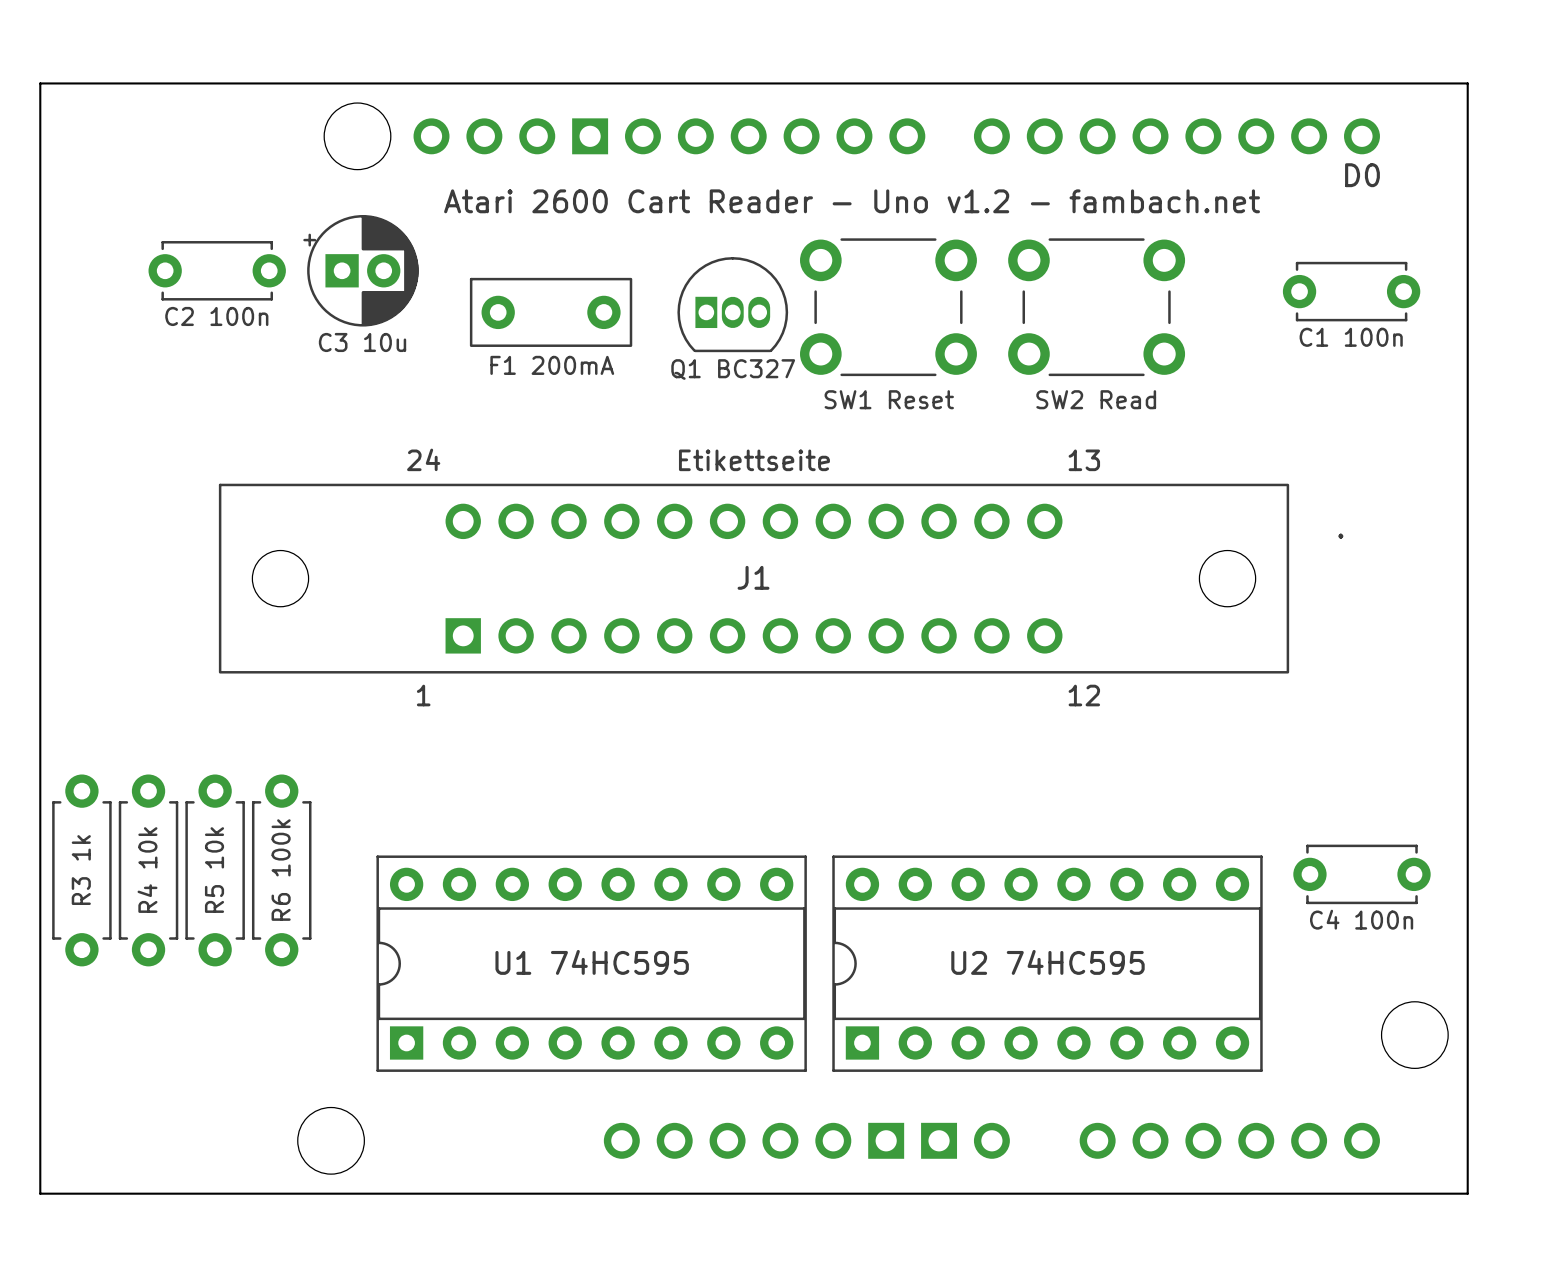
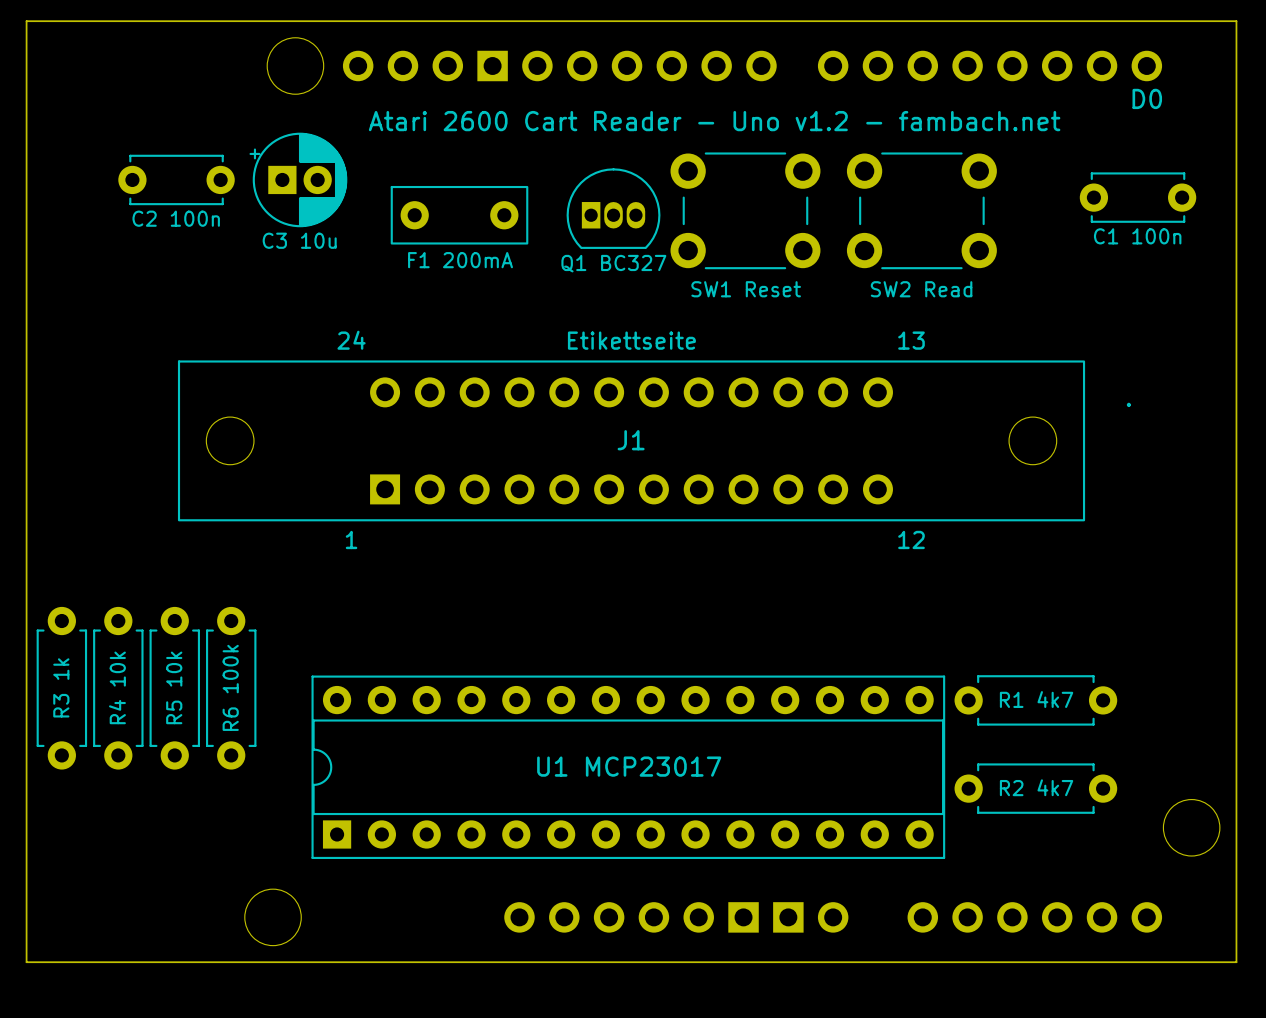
part: (1361, 874) -> none
text: none -> R1 4k7 (1036, 699)
part: none -> (1035, 700)
text: C4 100n (1361, 919) -> none
text: U1 74HC595 (592, 962) -> none
text: none -> U1 MCP23017 (629, 766)
text: U2 74HC595 (1047, 962) -> none
part: (591, 963) -> none
part: none -> (628, 767)
part: (1047, 963) -> none
text: none -> R2 4k7 (1036, 787)
part: none -> (1035, 788)

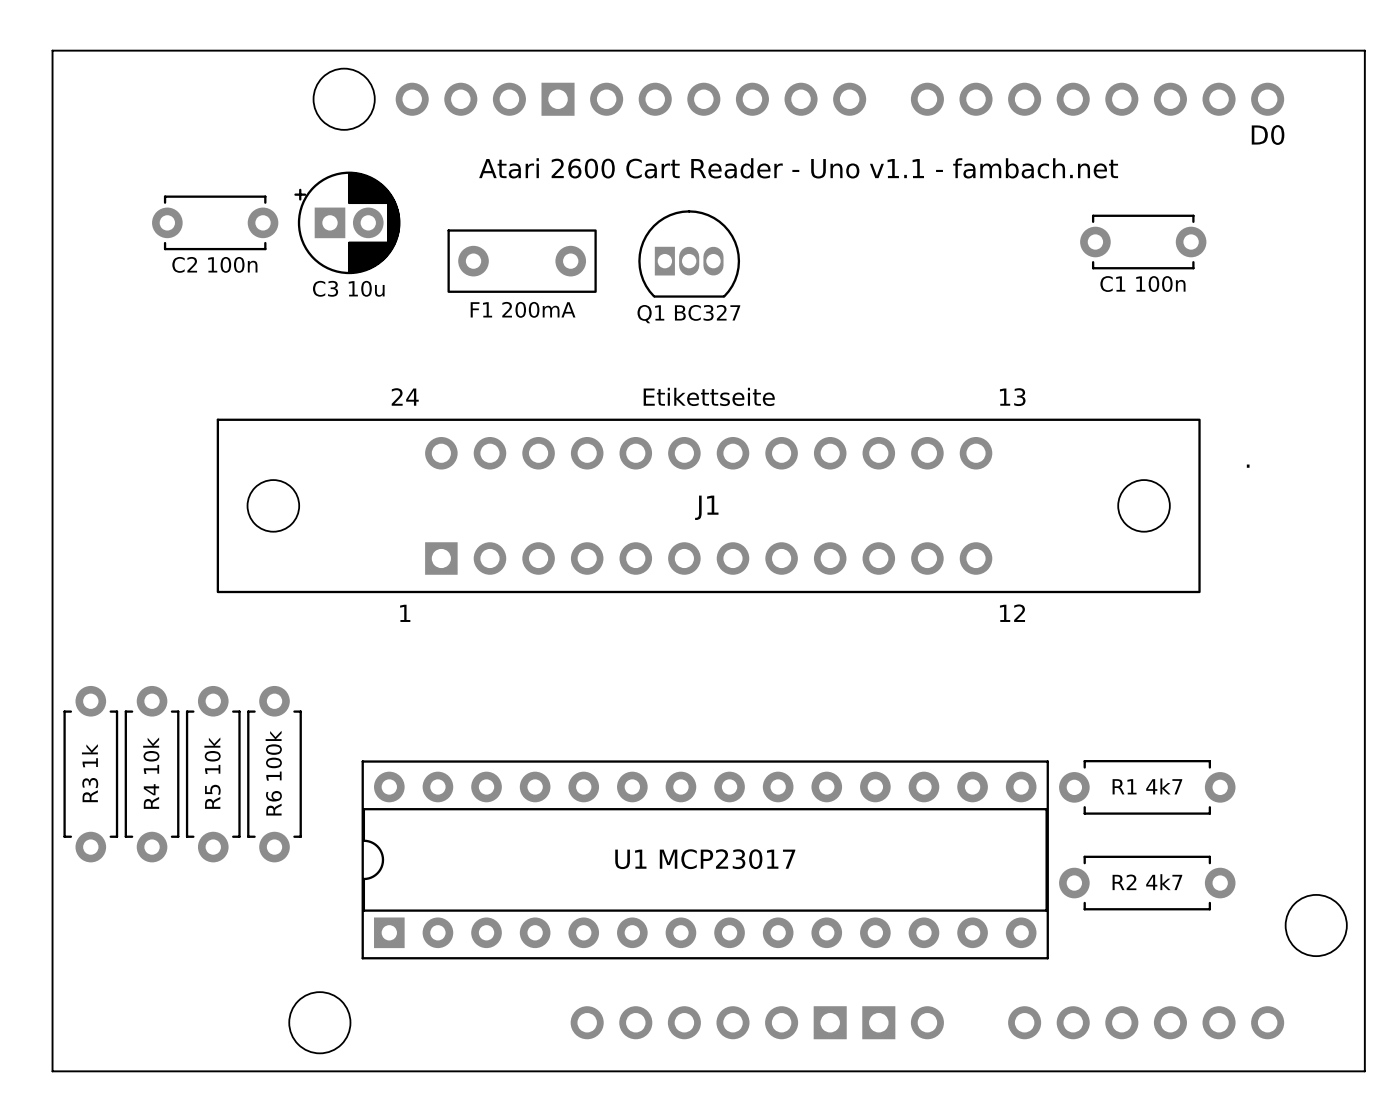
text: Atari 2600 Cart Reader - Uno v1.2 - fambach.net (714, 121) -> Atari 2600 Cart Reader - Uno v1.1 - fambach.net (798, 168)
part position: (1138, 197) -> (1143, 242)
part: (745, 210) -> none
part: (921, 210) -> none
text position: C1 100n (1137, 236) -> C1 100n (1142, 284)
text: SW1 Reset (746, 289) -> none
text: SW2 Read (921, 289) -> none

